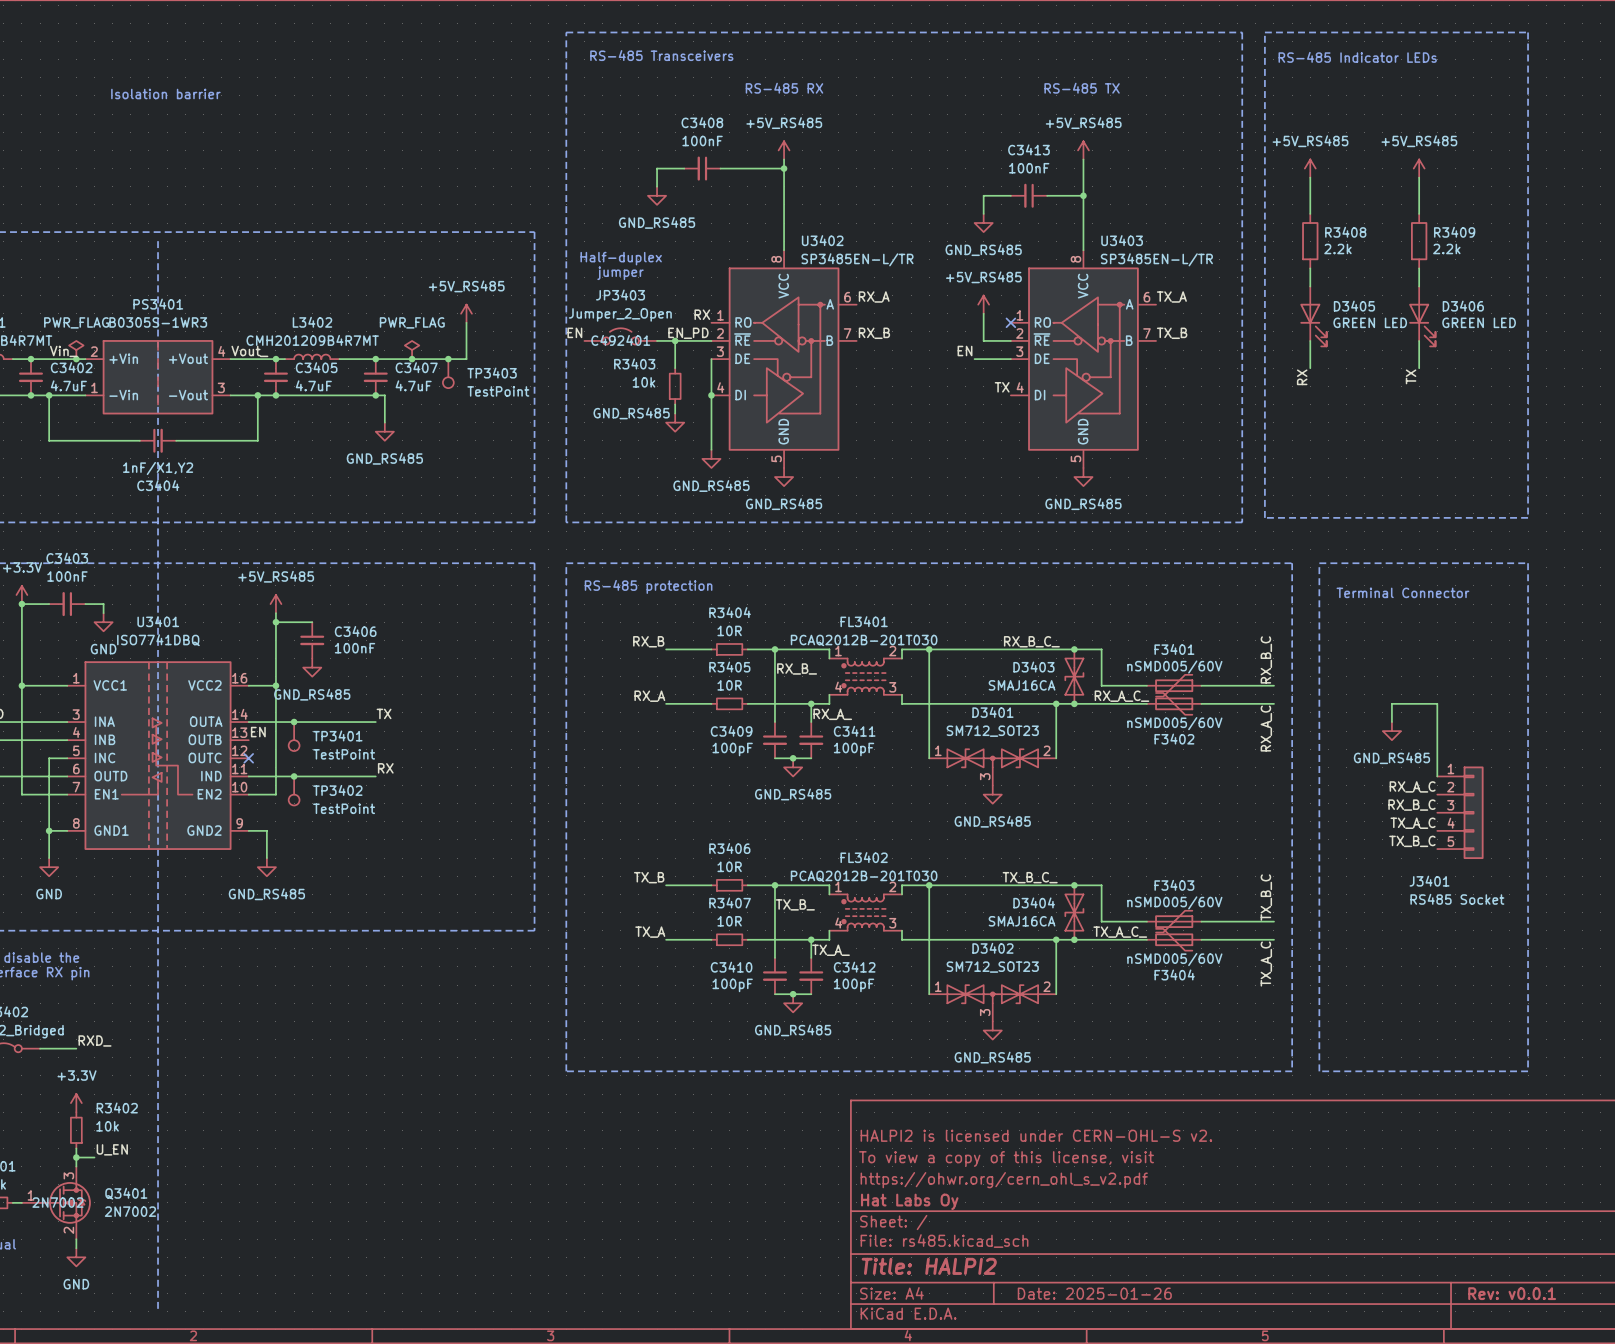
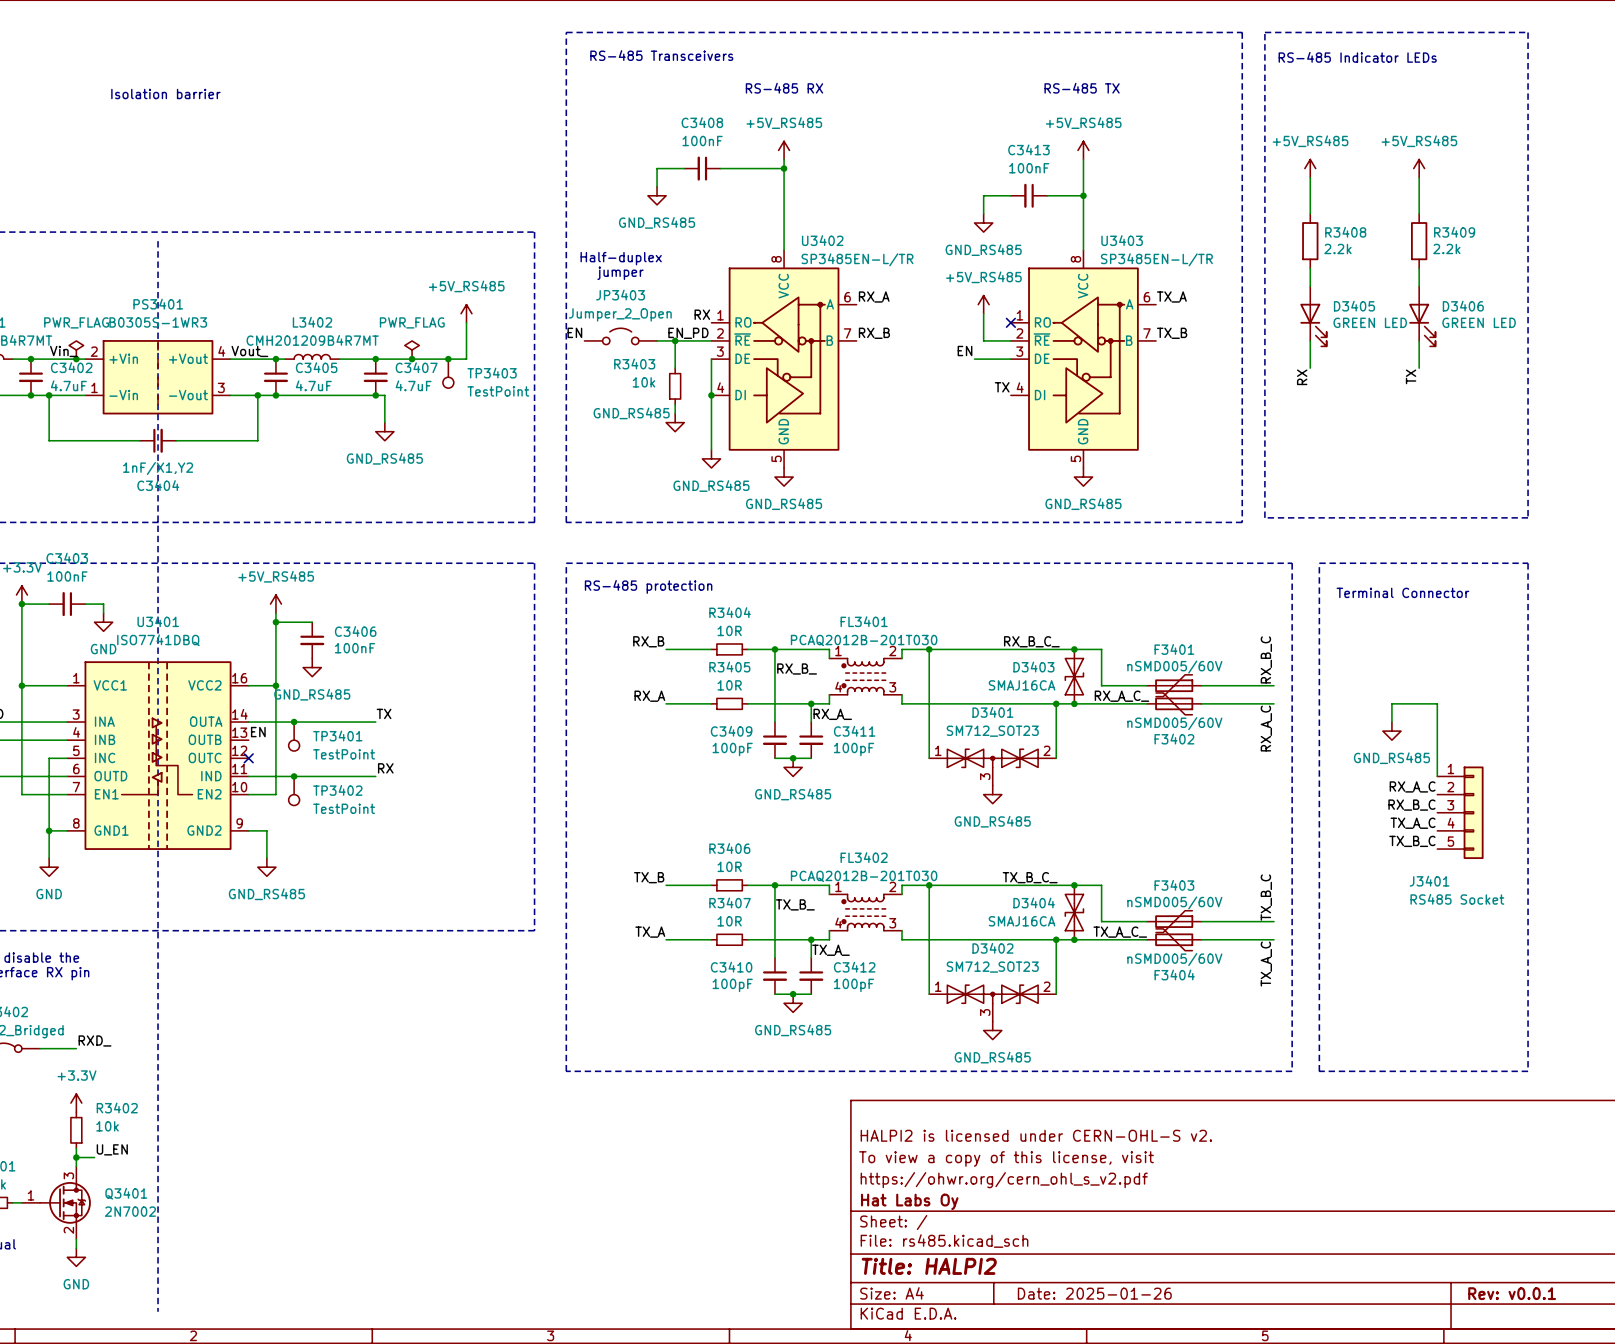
JP3403 text: C492401 (620, 340) -> none
Q3401 text: 2N7002 (58, 1202) -> none

